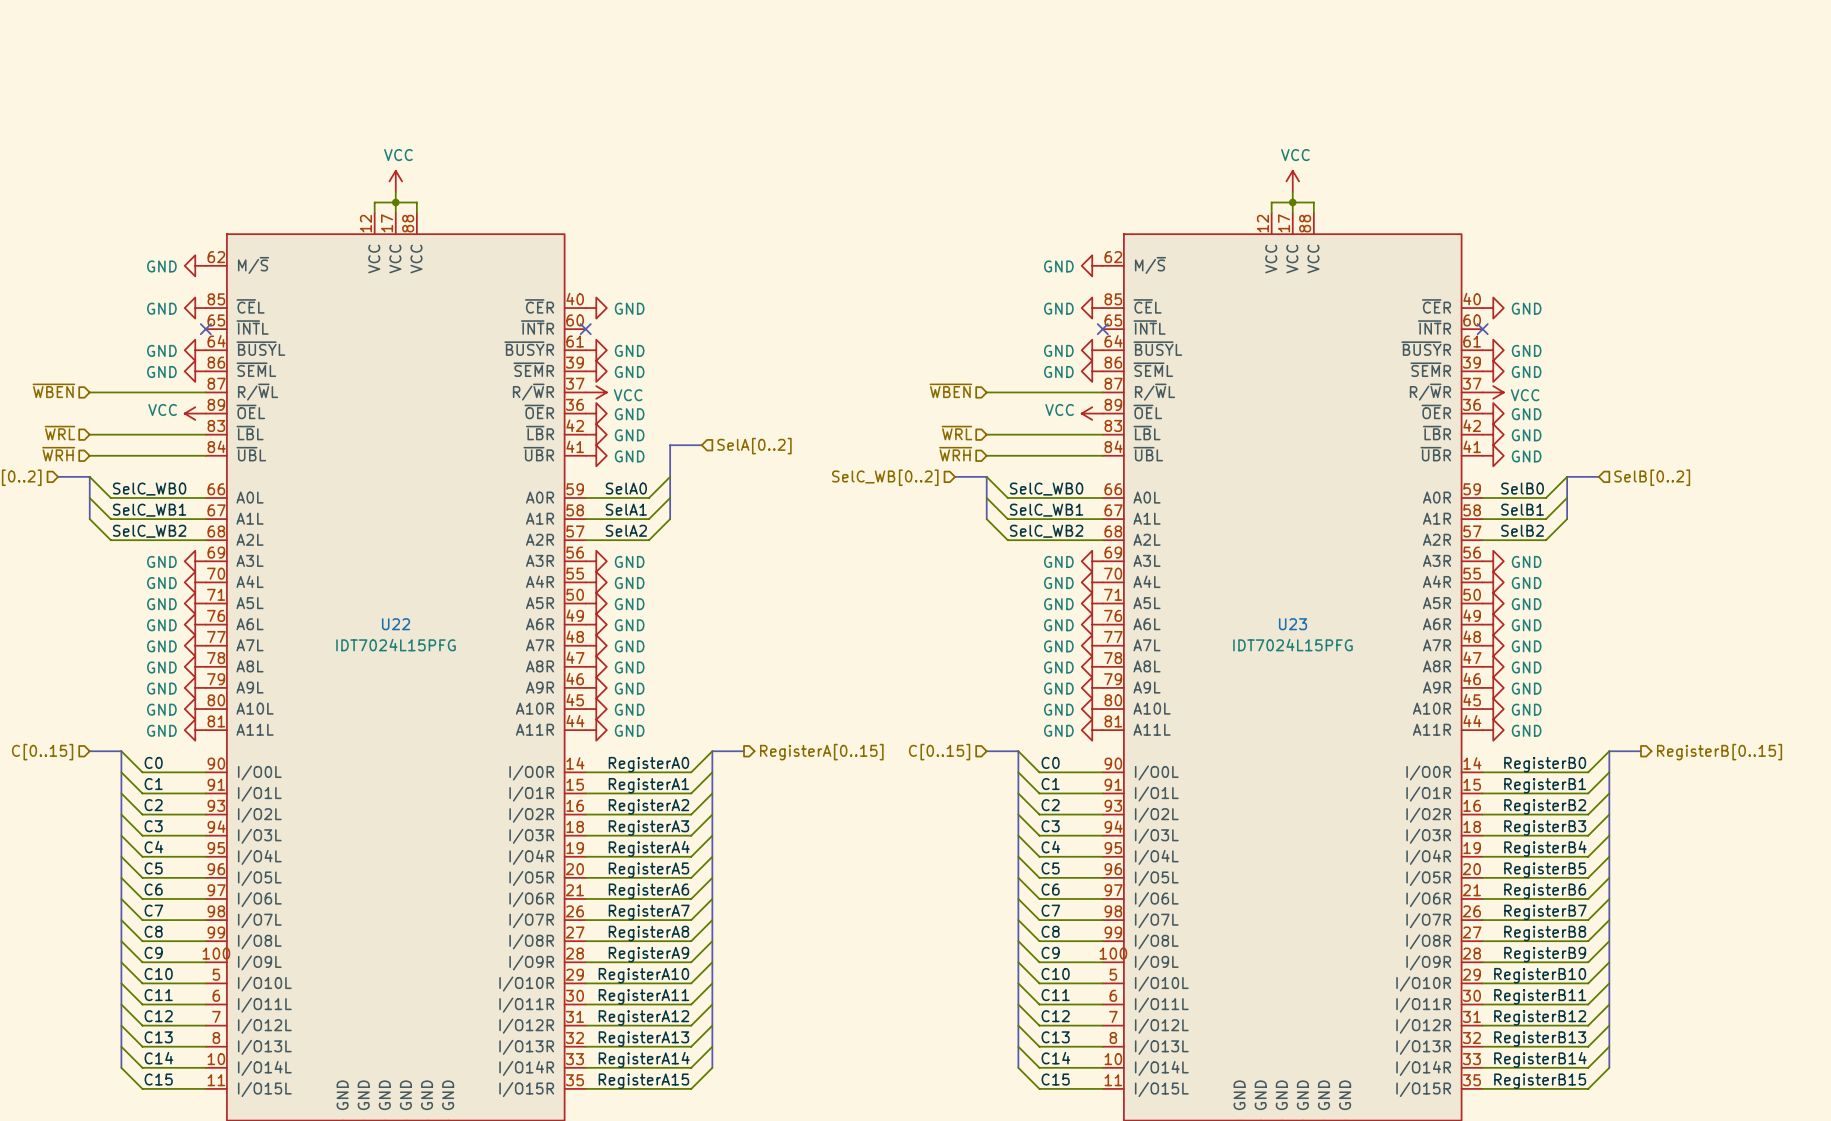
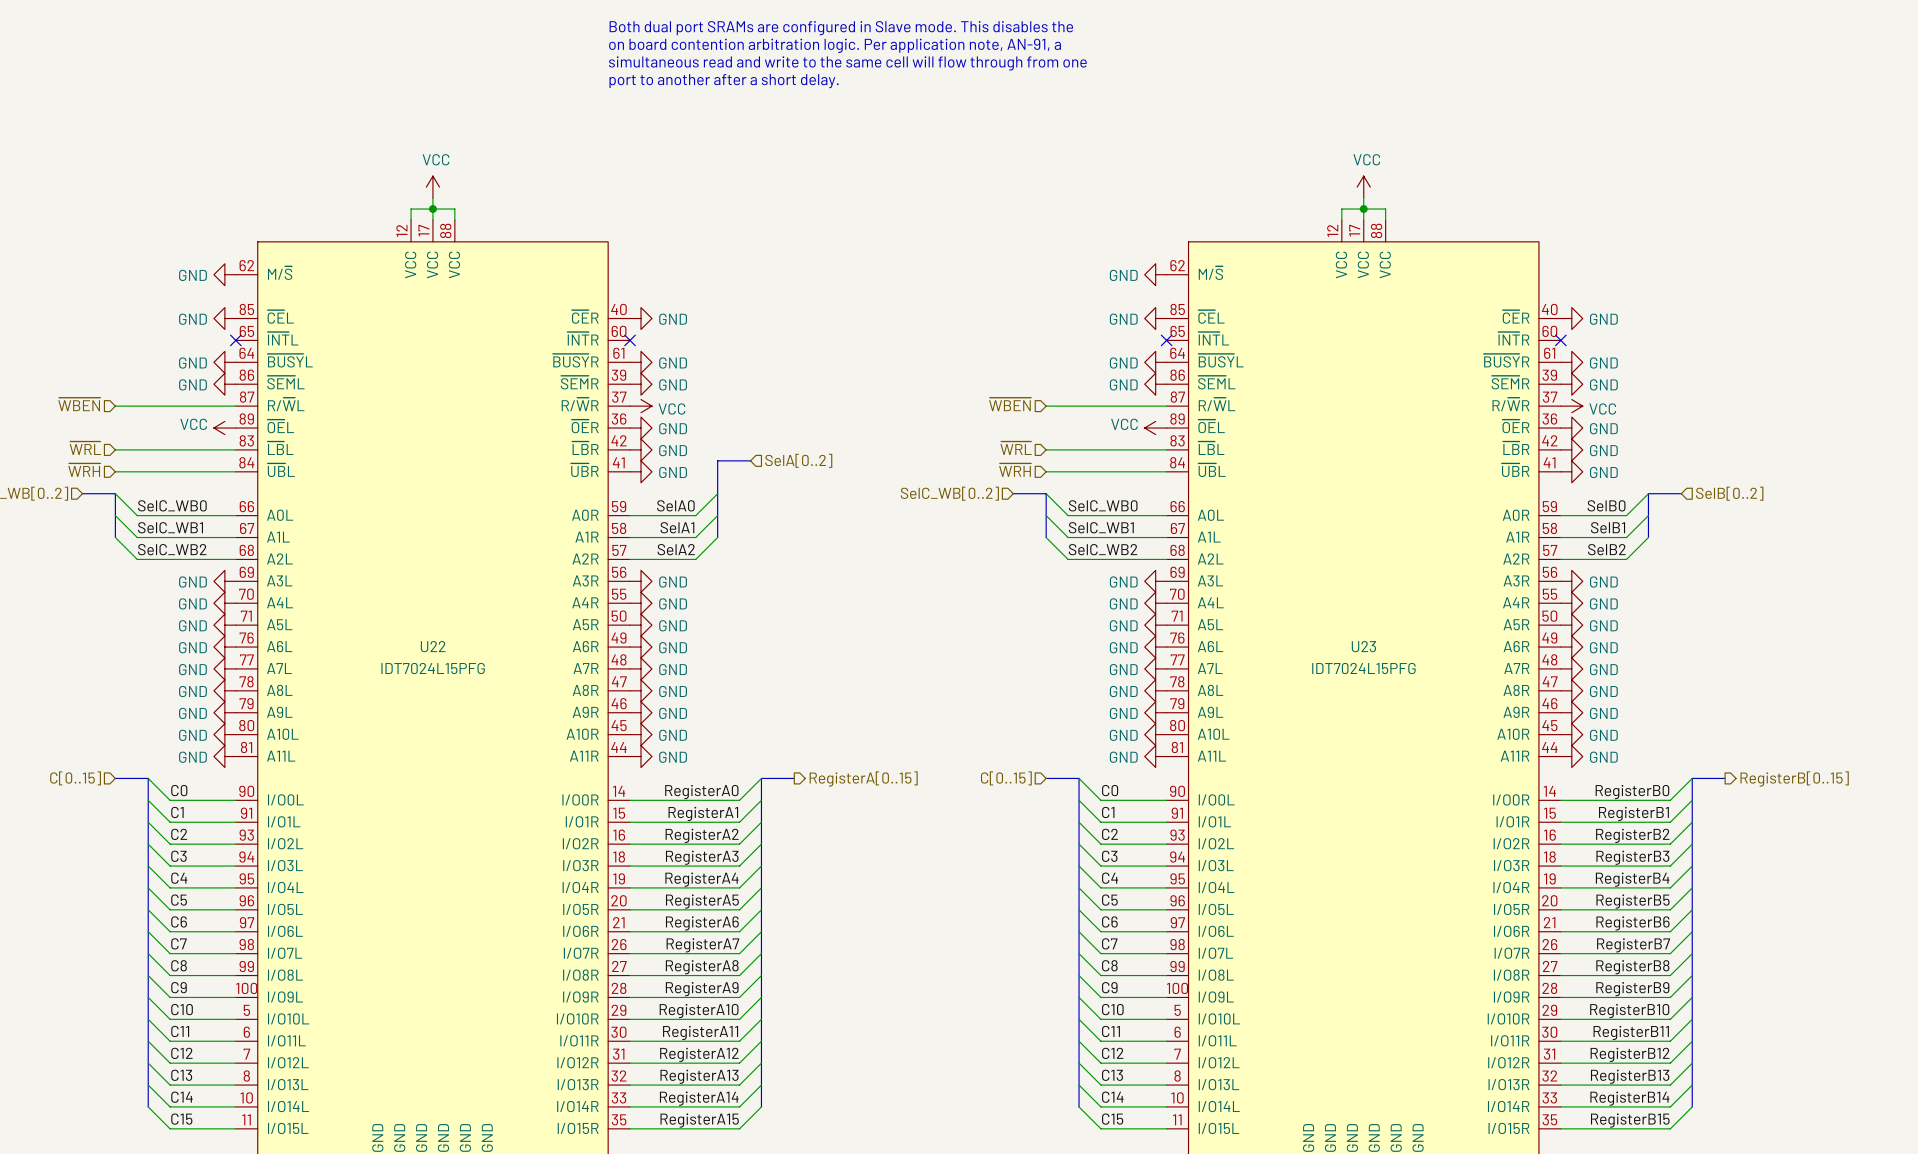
text: none -> Both dual port SRAMs are configured in Slave mode. This disables the (841, 28)
text: none -> on board contention arbitration logic. Per application note, AN-91, a (835, 45)
text: none -> simultaneous read and write to the same cell will flow through from one (847, 63)
text: none -> port to another after a short delay. (724, 81)

